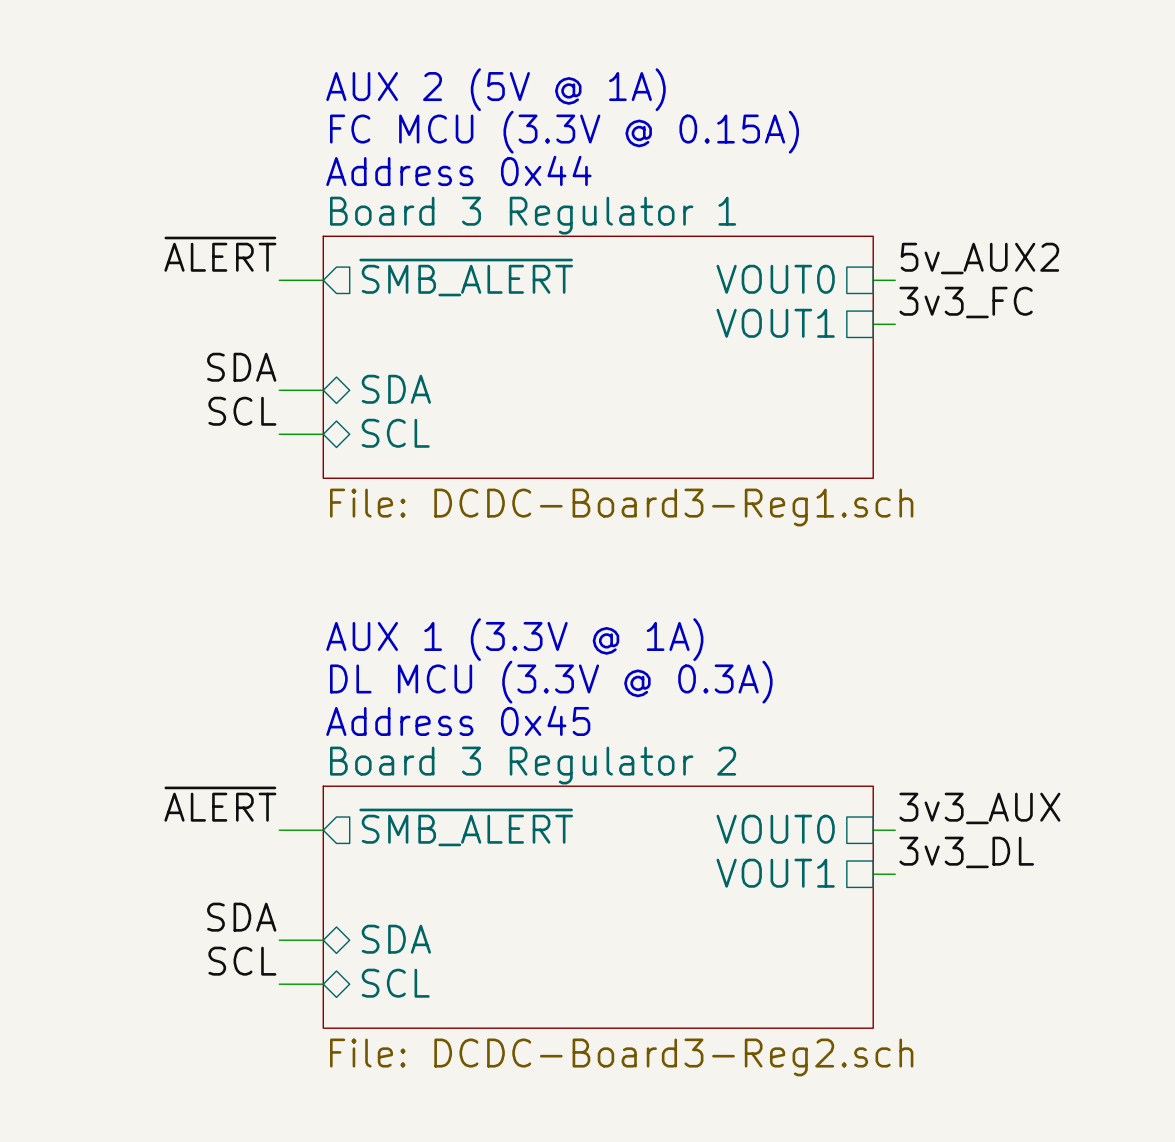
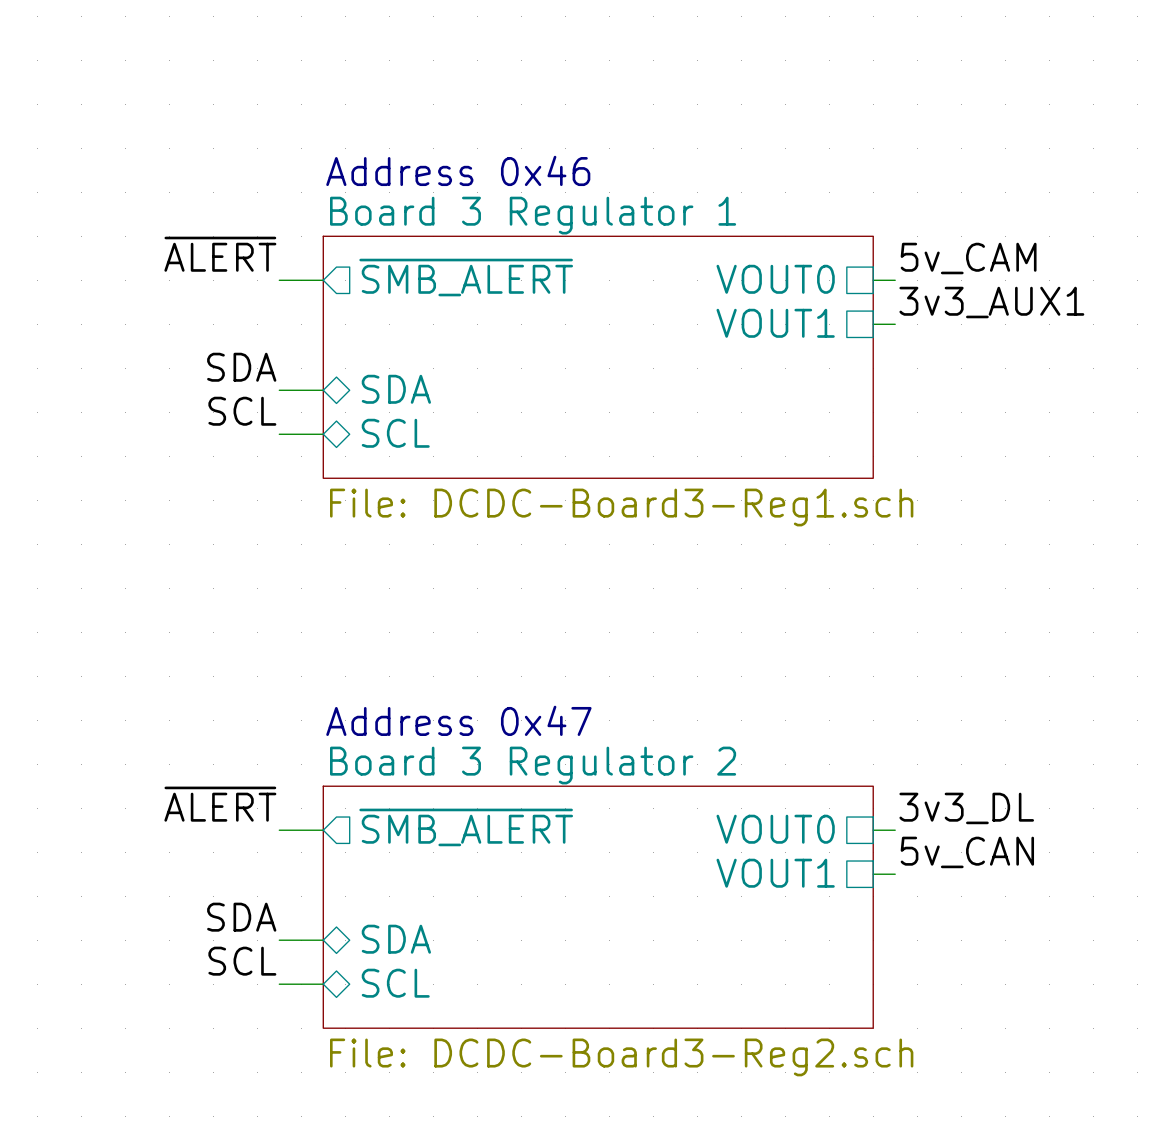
text: AUX 2 (5V @ 1A) (495, 89) -> none
text: FC MCU (3.3V @ 0.15A) (564, 132) -> none
text: Address 0x44 (458, 170) -> Address 0x46 (458, 170)
label: 5v_AUX2 (979, 258) -> 5v_CAM (968, 258)
label: 3v3_FC (966, 302) -> 3v3_AUX1 (991, 302)
text: AUX 1 (3.3V @ 1A) (514, 639) -> none
text: DL MCU (3.3V @ 0.3A) (551, 682) -> none
text: Address 0x45 (458, 720) -> Address 0x47 (458, 720)
label: 3v3_AUX (979, 808) -> 3v3_DL (966, 808)
label: 3v3_DL (966, 852) -> 5v_CAN (967, 852)

